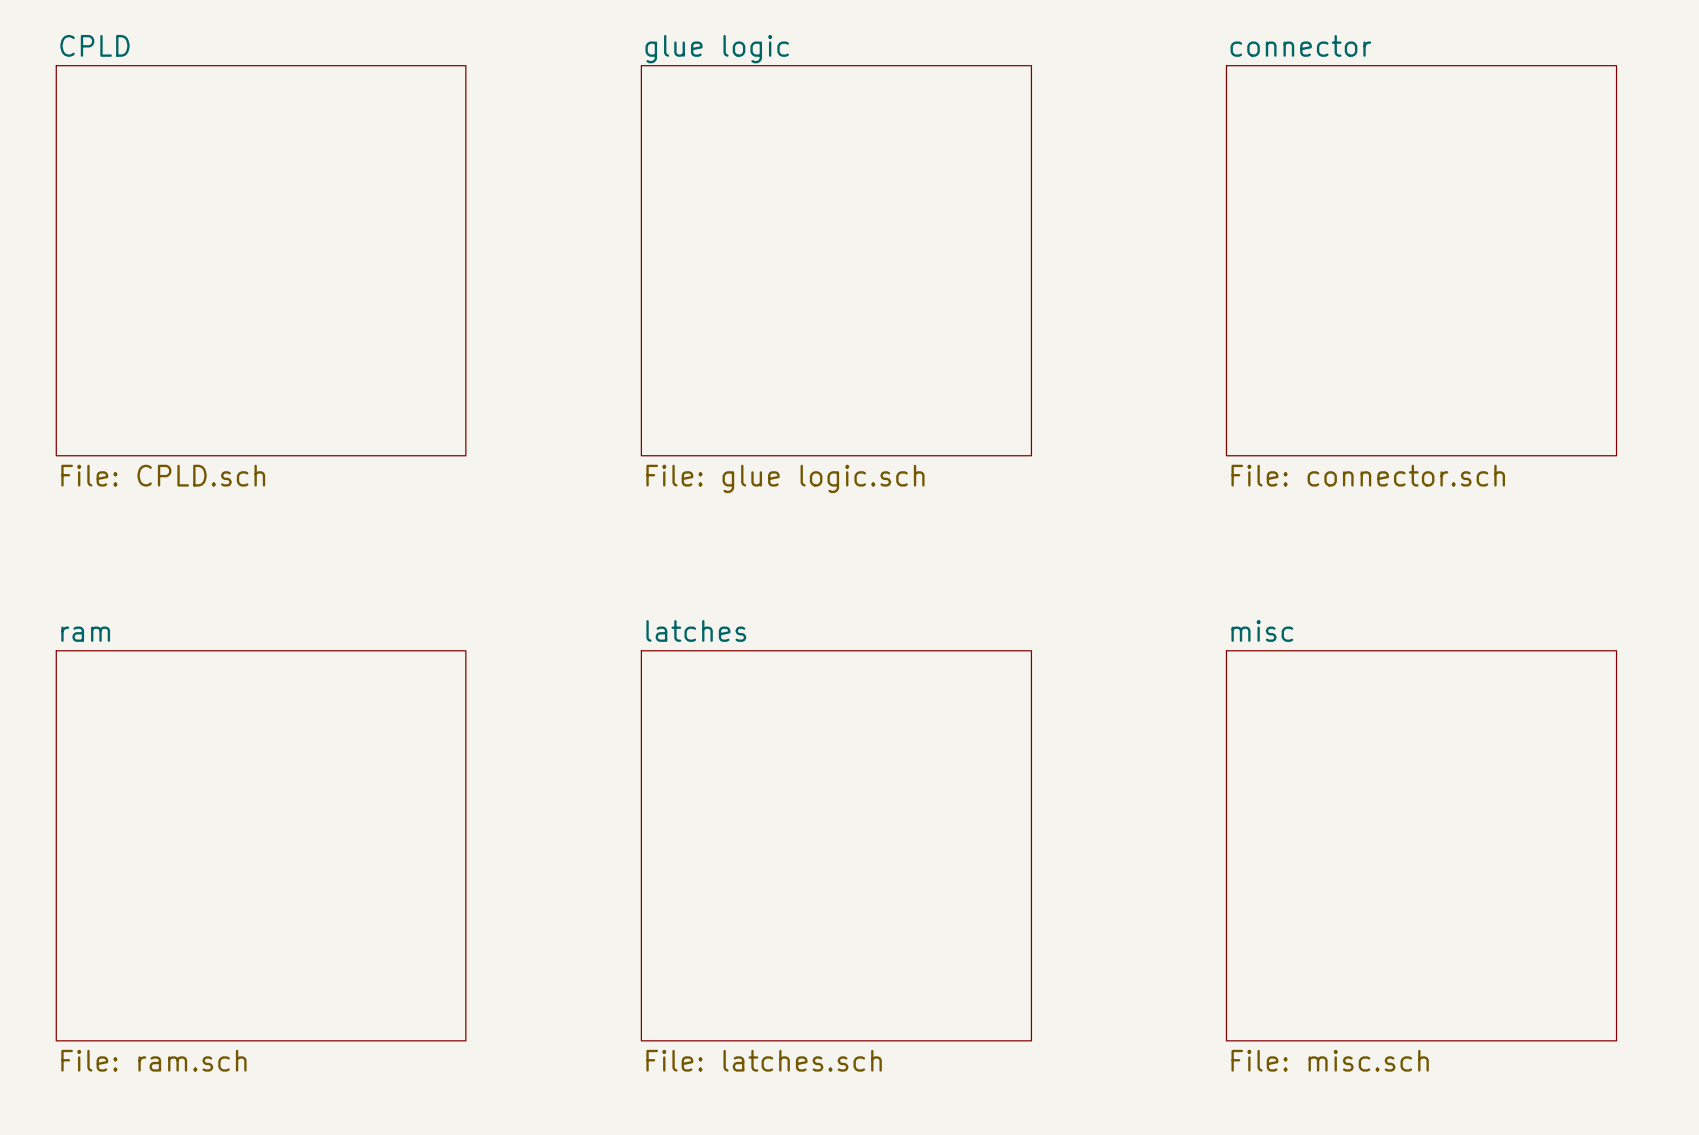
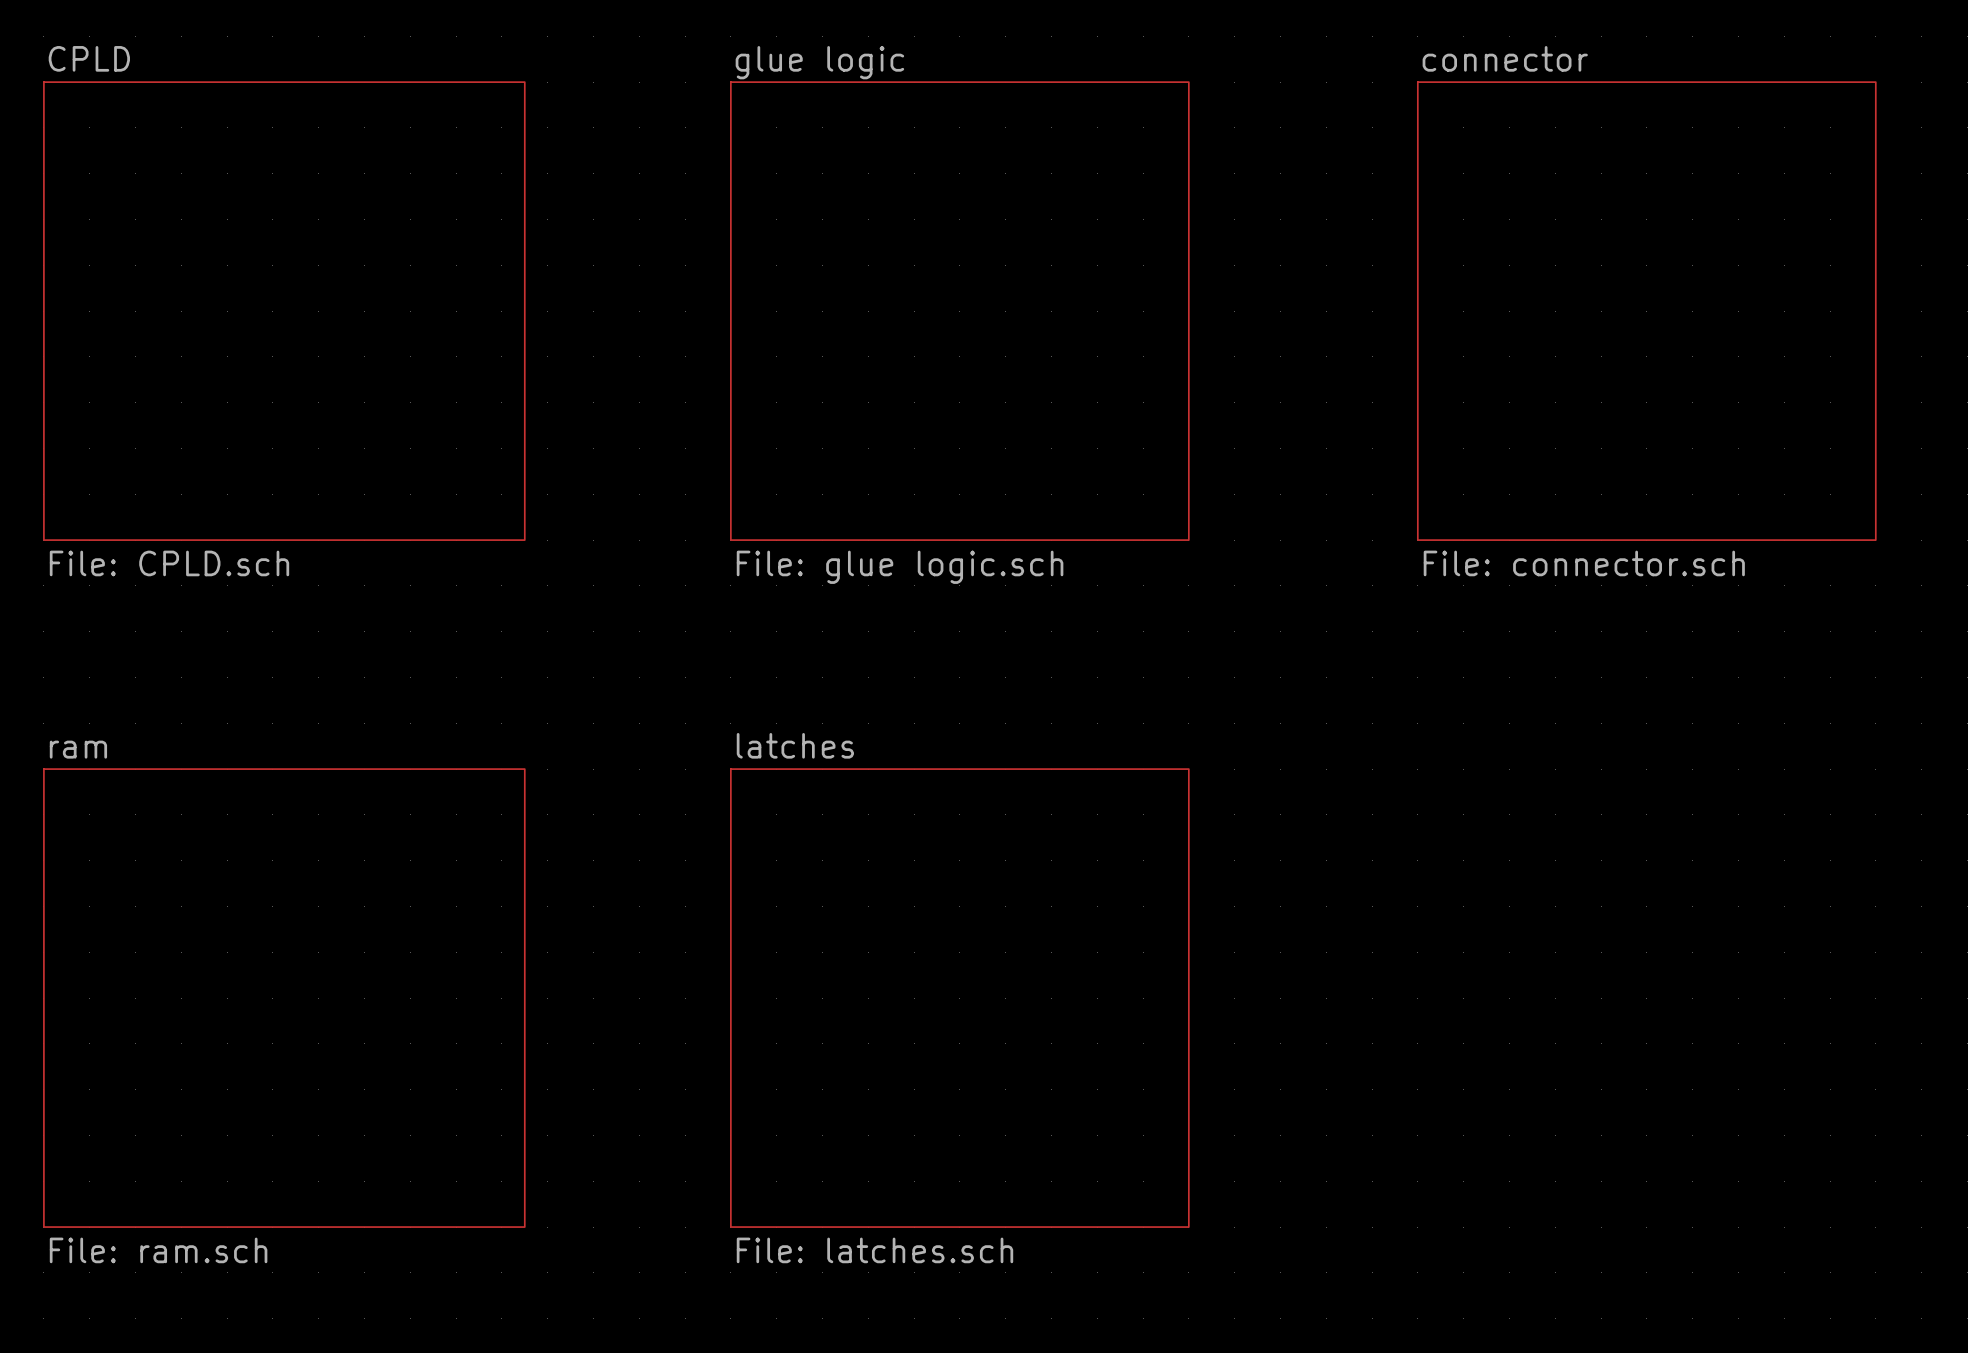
sheet misc: File: misc.sch (1421, 845) -> none

